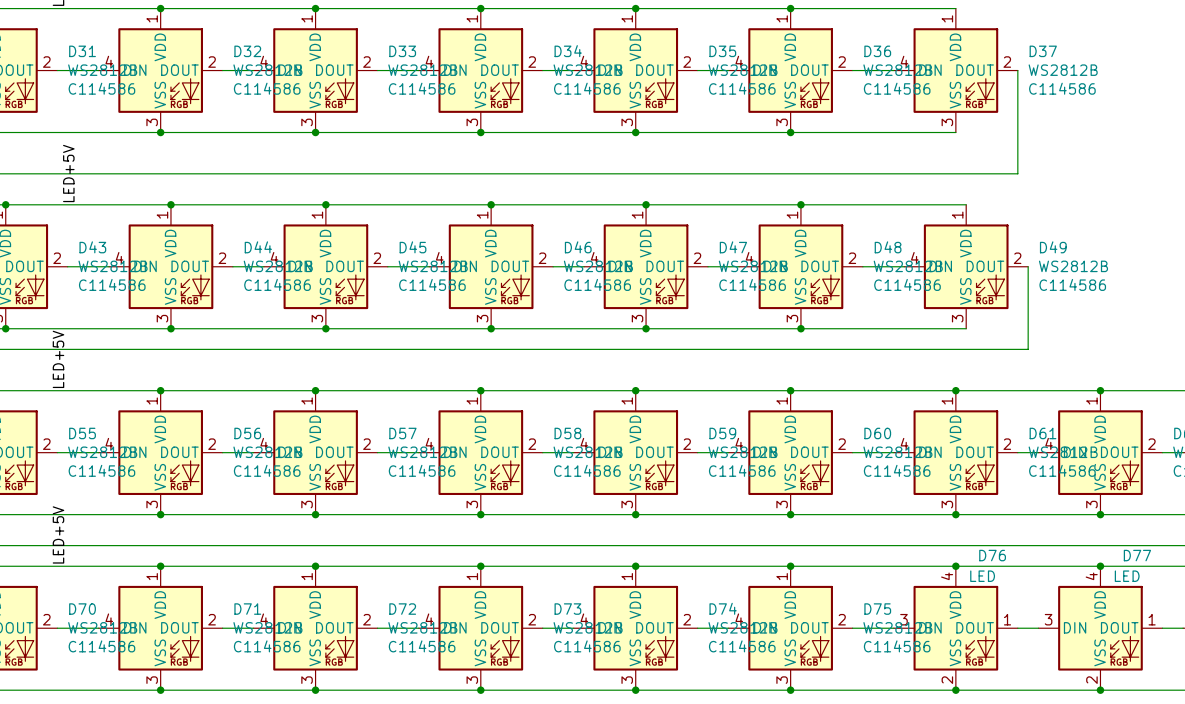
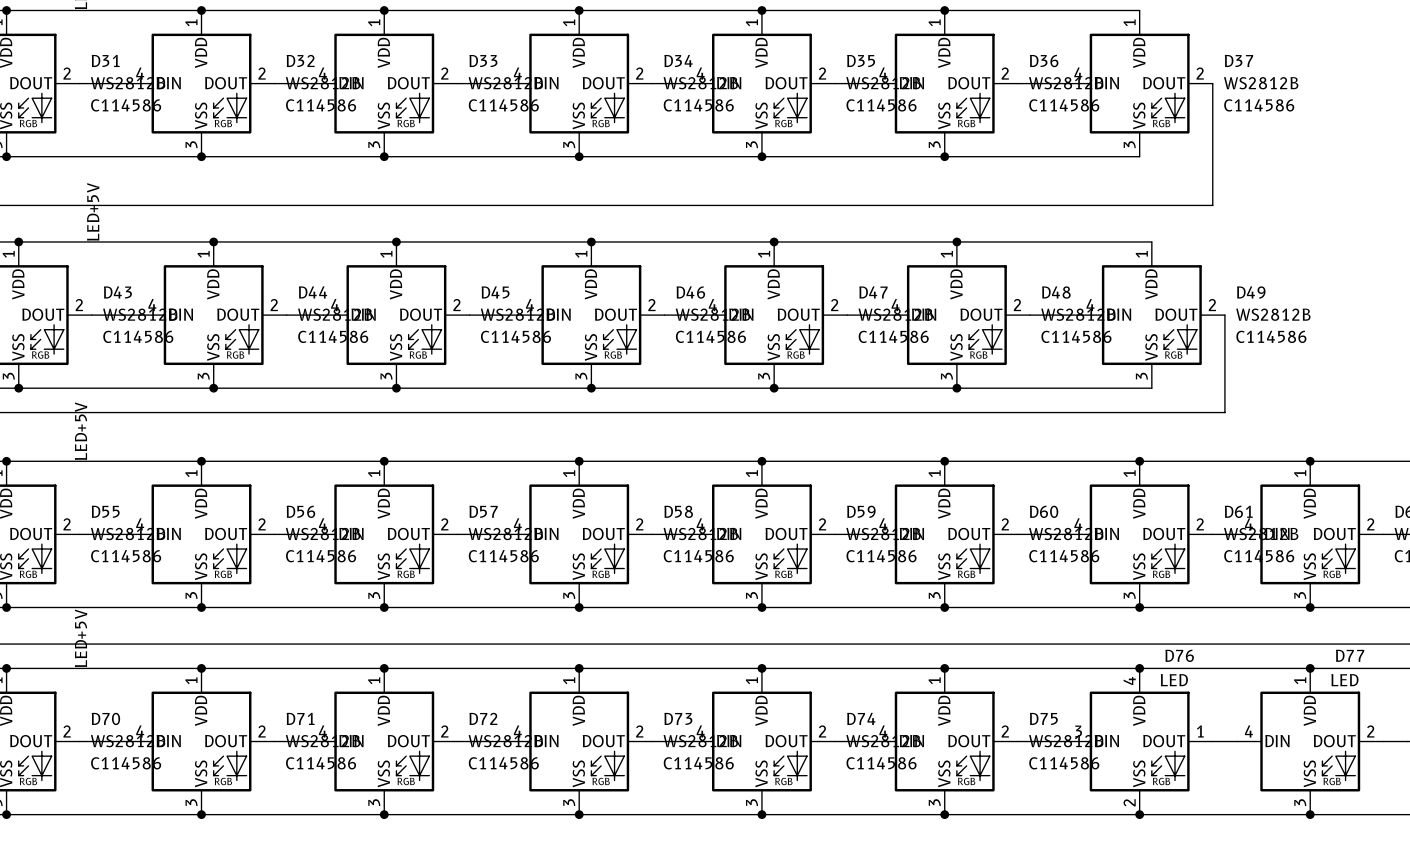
D77 pin number: 4 (1091, 576) -> 1 (1300, 680)
D77 pin number: 3 (1048, 619) -> 4 (1248, 731)
D77 pin number: 1 (1152, 619) -> 2 (1370, 731)
D77 pin number: 2 (1091, 680) -> 3 (1300, 802)

